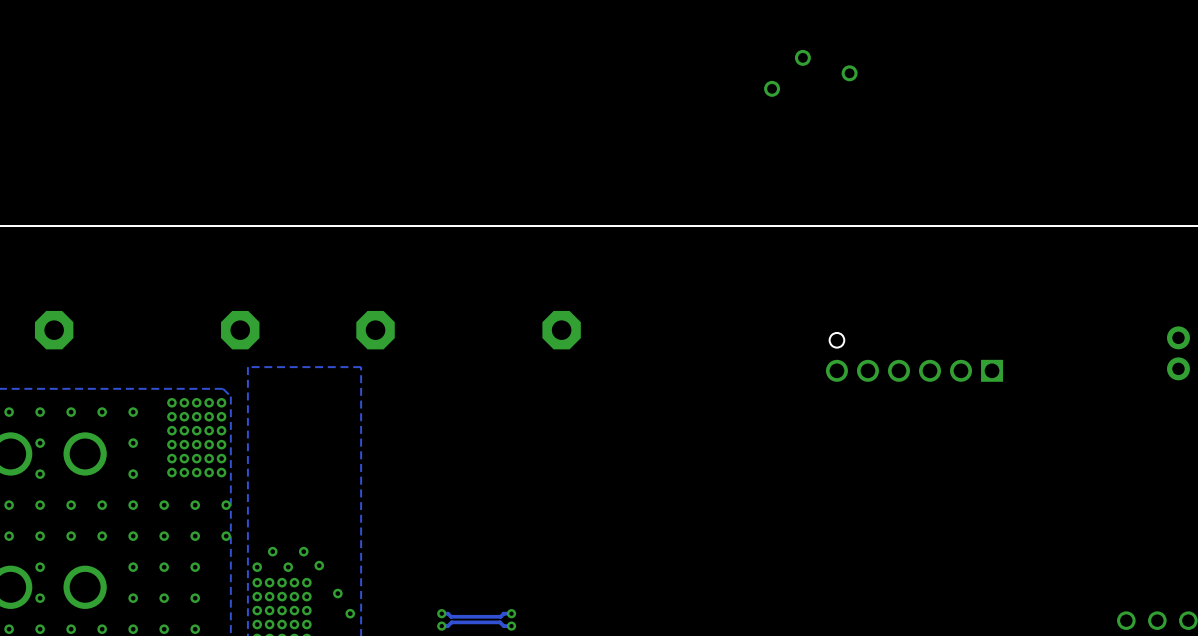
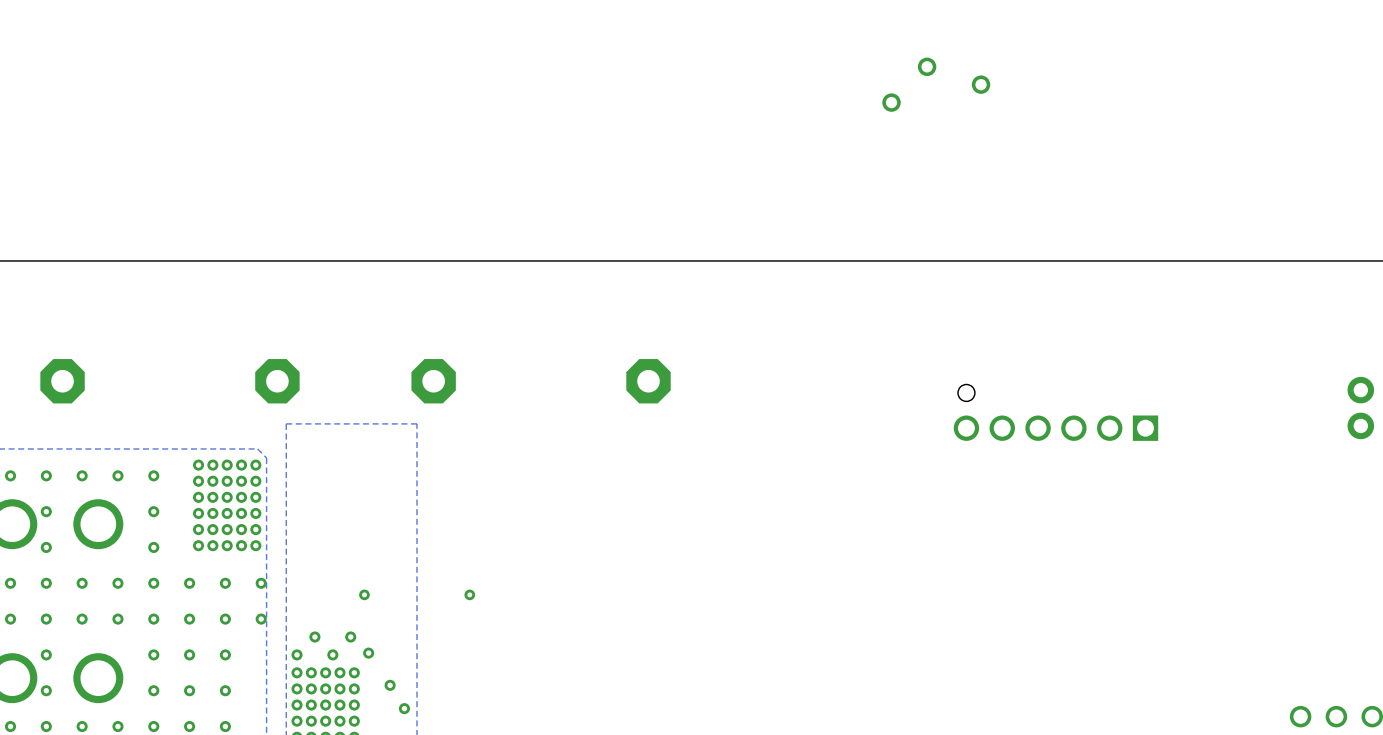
via: none -> (364, 594)
via: none -> (469, 594)
via: (441, 613) -> none
track: (511, 613) (503, 613) (500, 616) (451, 616) (447, 613) (441, 613) -> none
via: (511, 613) -> none
via: (441, 626) -> none
track: (511, 626) (503, 626) (500, 622) (451, 622) (447, 626) (441, 626) -> none
via: (511, 626) -> none

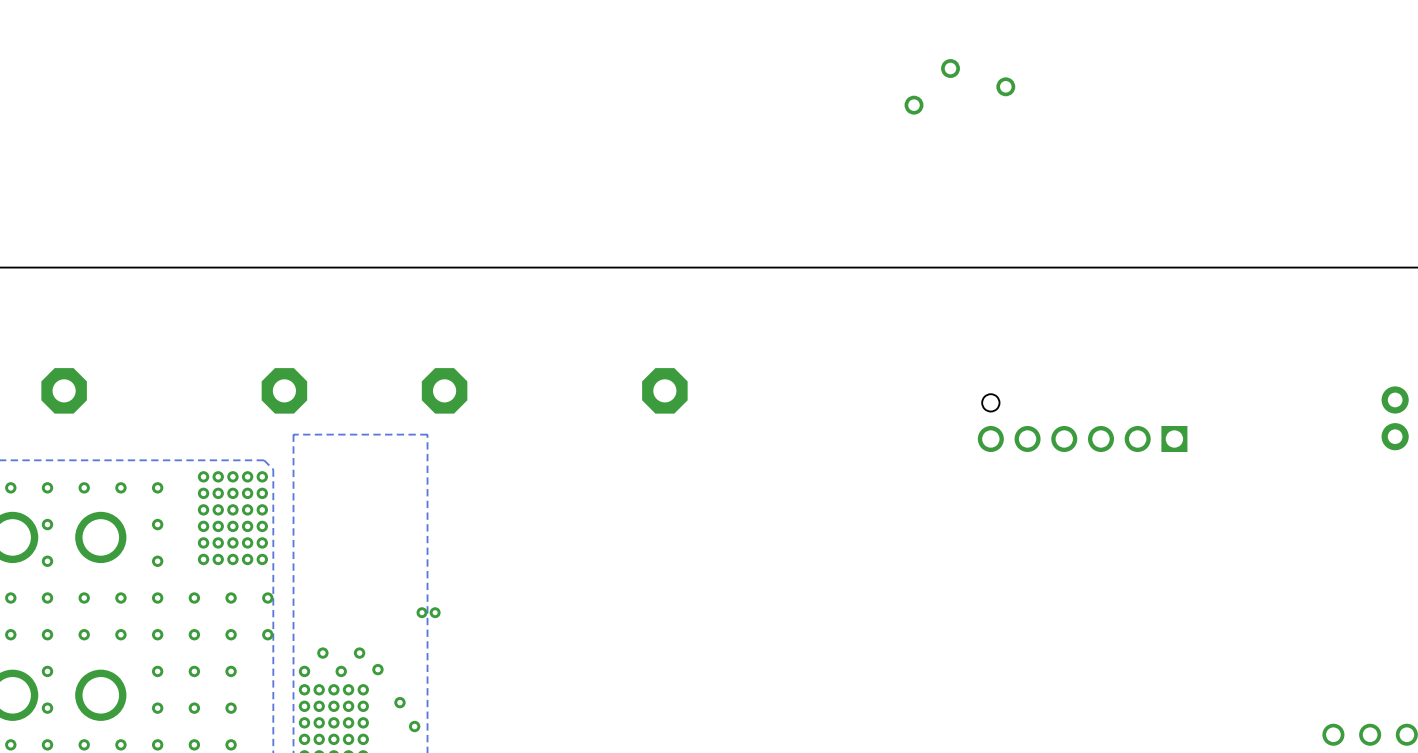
via: (364, 594) -> none
via: (469, 594) -> none
via: none -> (422, 612)
via: none -> (435, 612)

